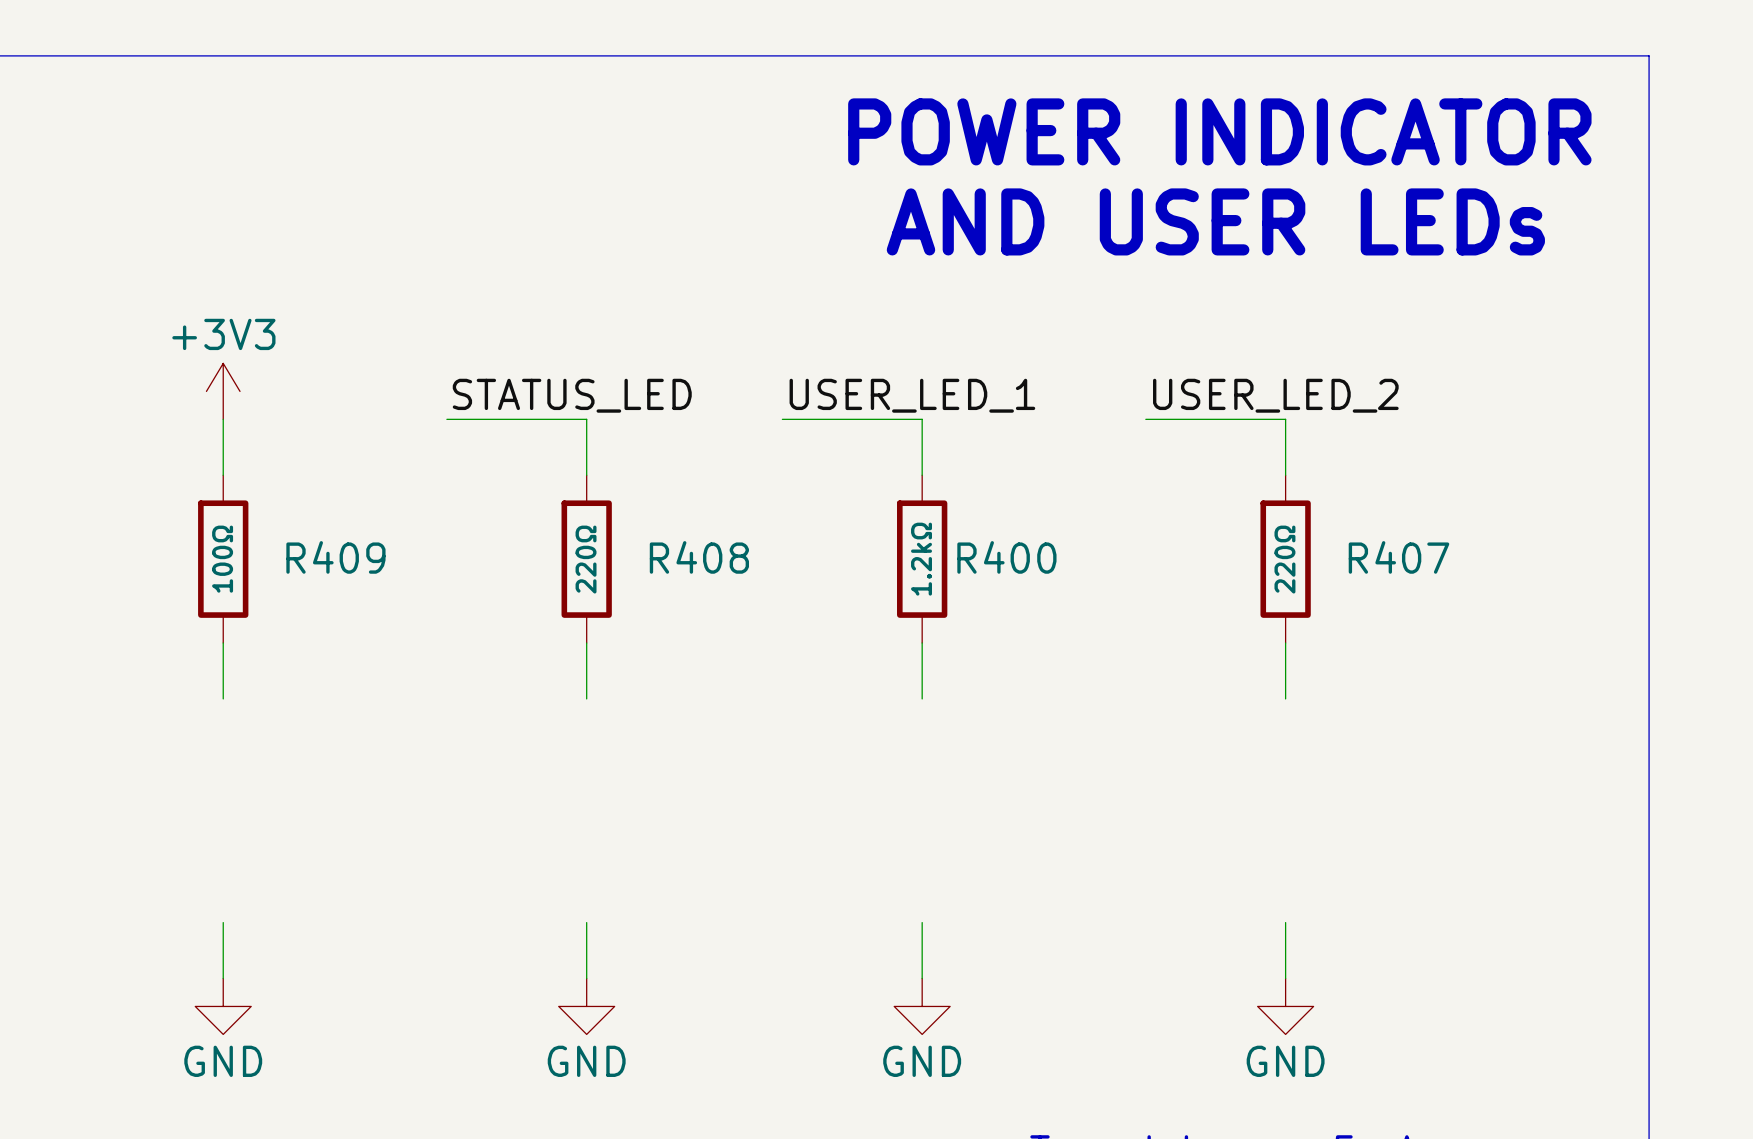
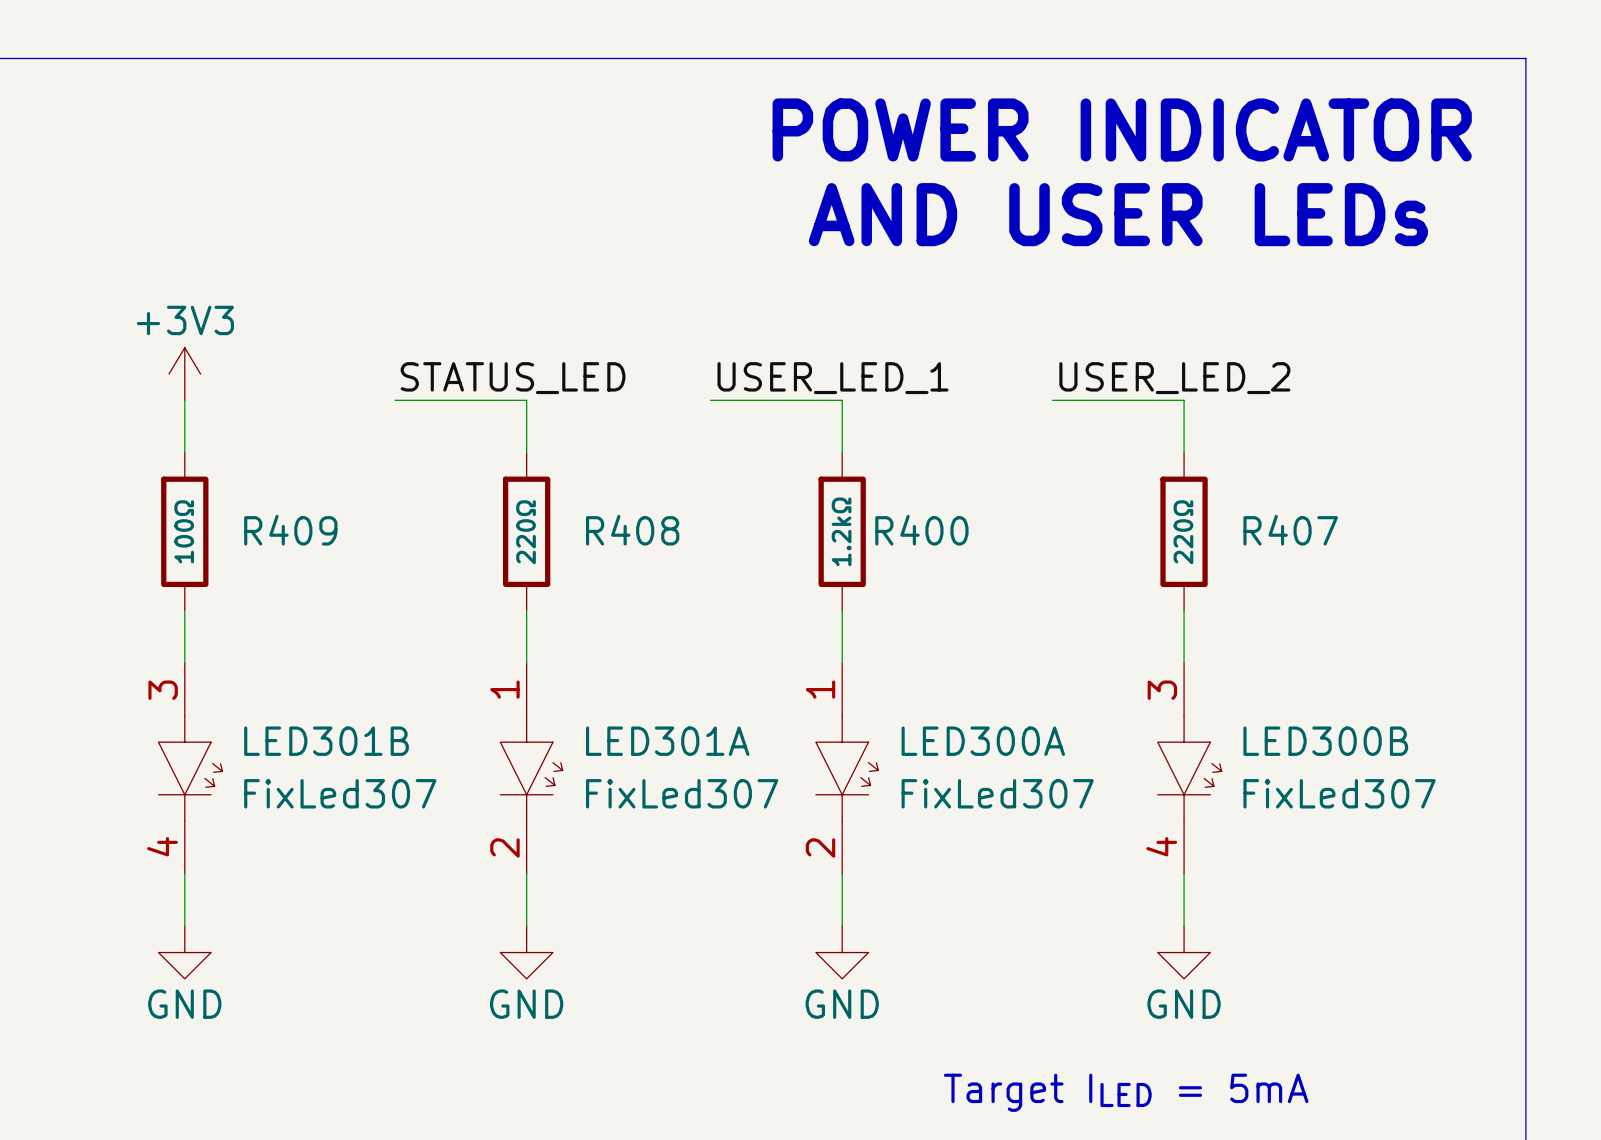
LED301B: none -> FixLed307 (190, 768)
LED301A: none -> FixLed307 (531, 768)
LED300A: none -> FixLed307 (847, 768)
LED300B: none -> FixLed307 (1189, 768)

